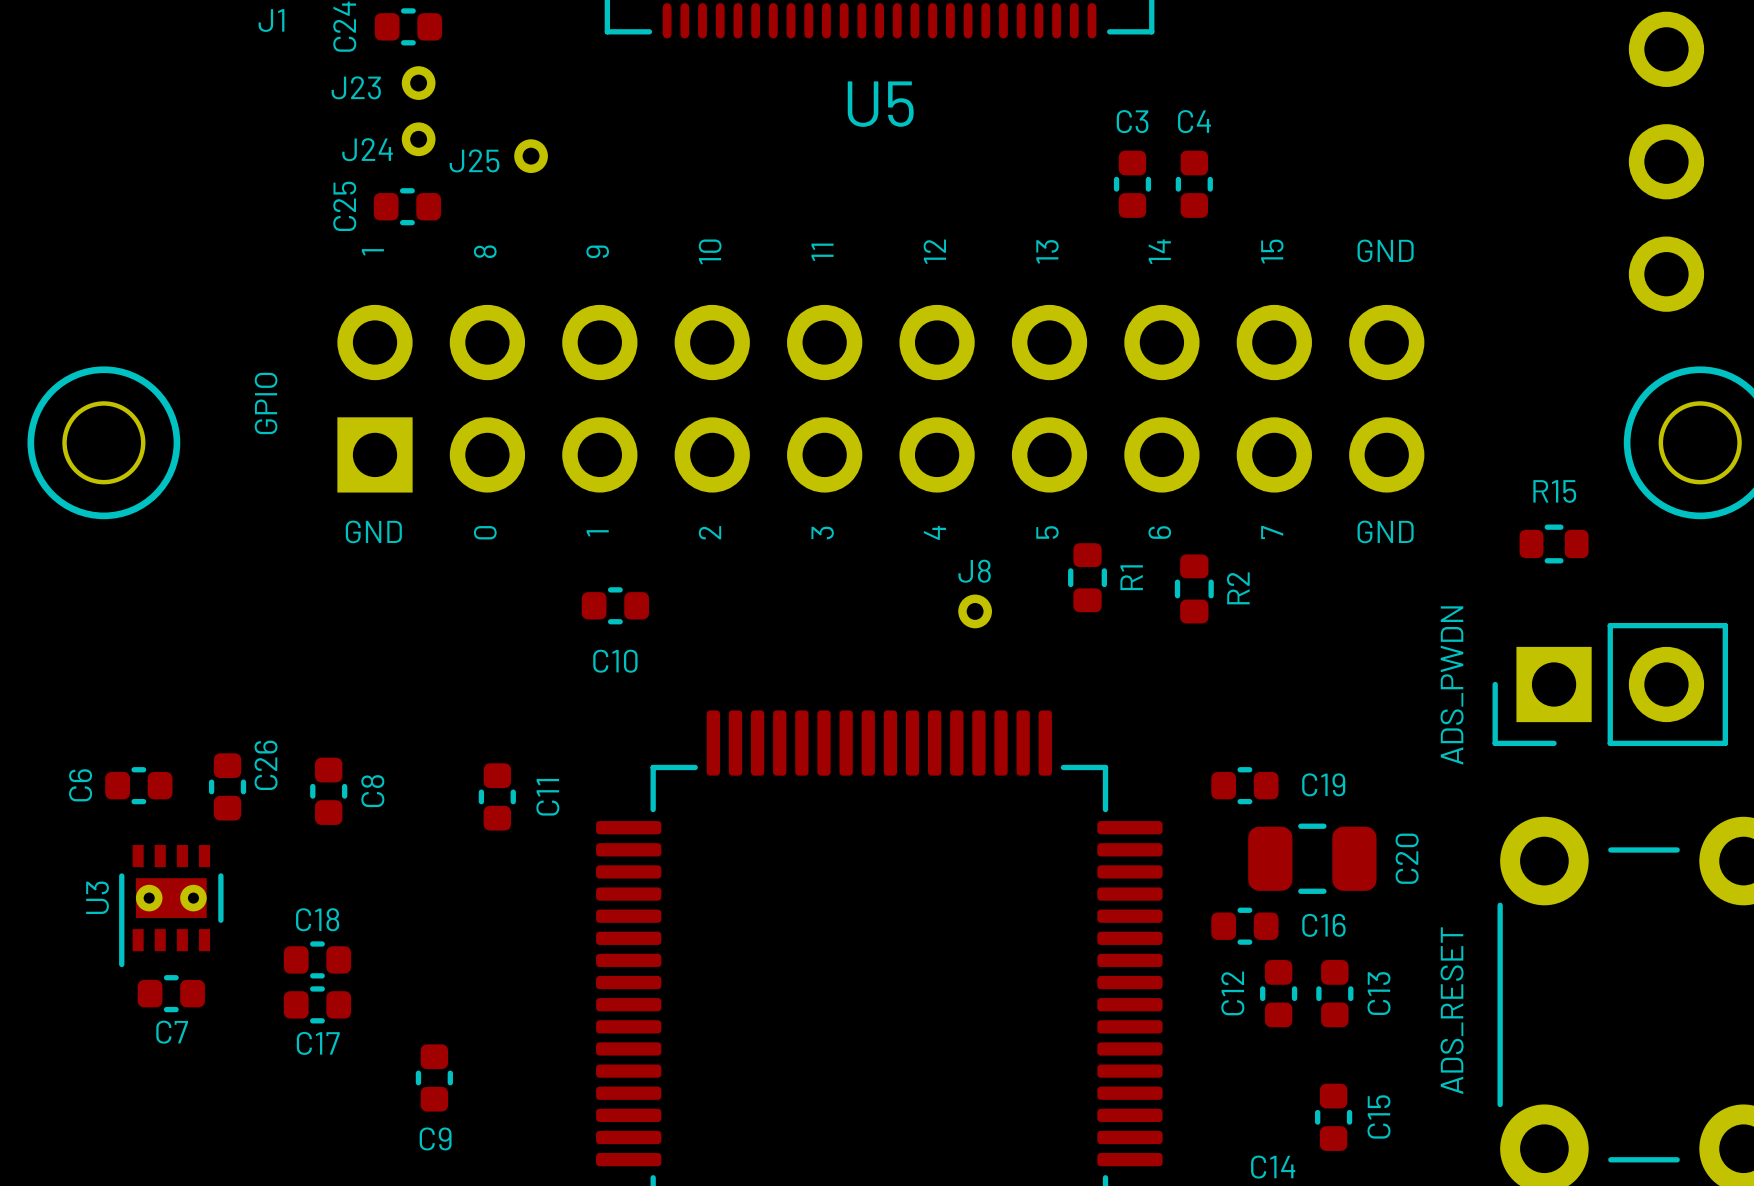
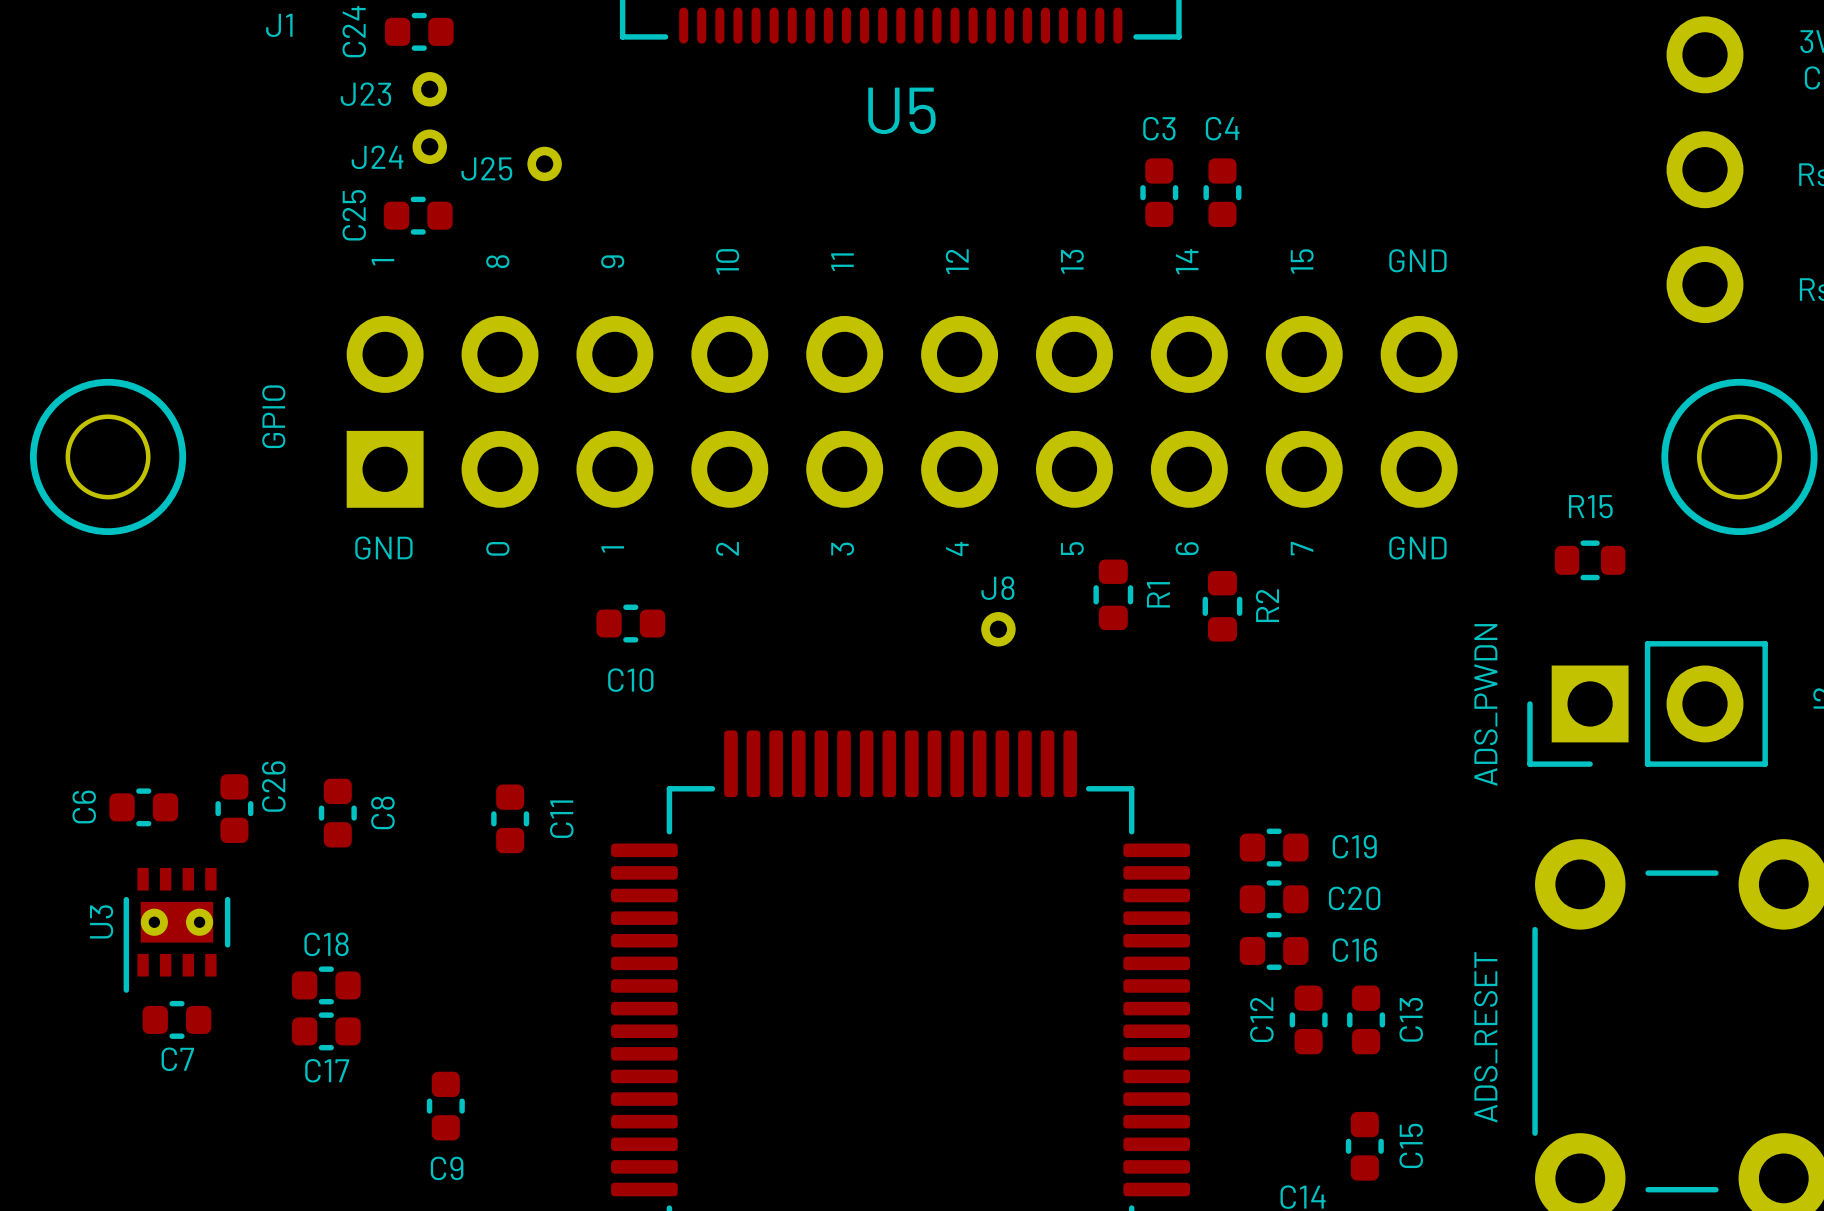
C19 position: (1244, 785) -> (1274, 847)
C20 footprint: [1248, 823, 1377, 894] -> [1239, 880, 1309, 919]

